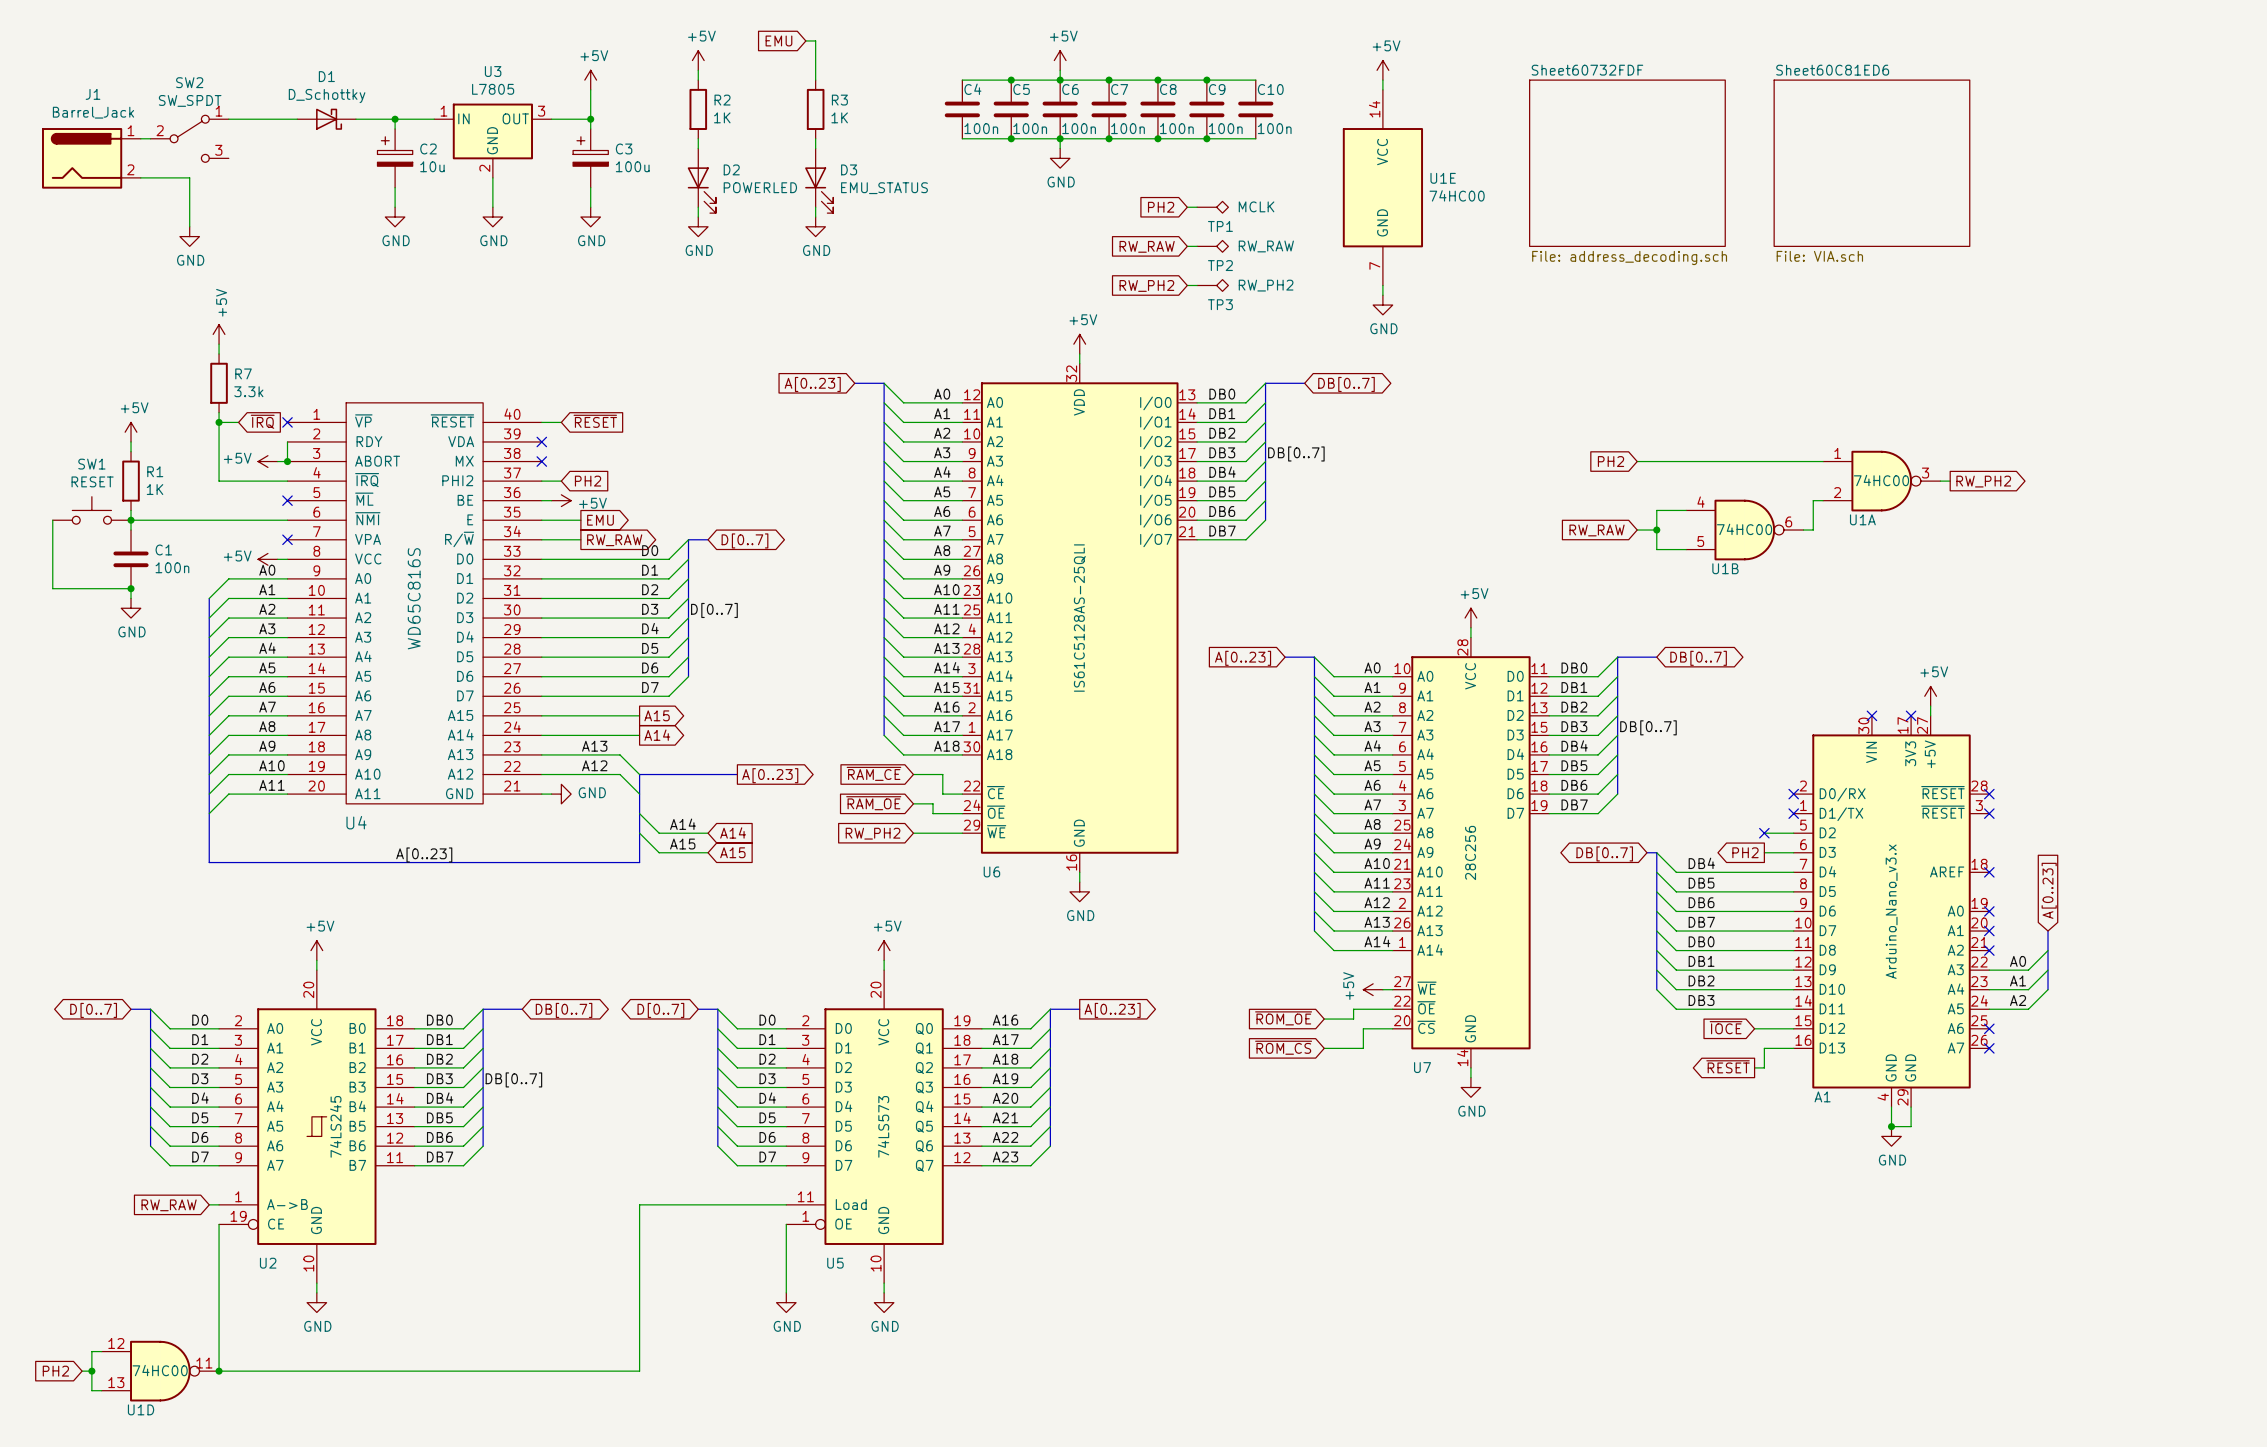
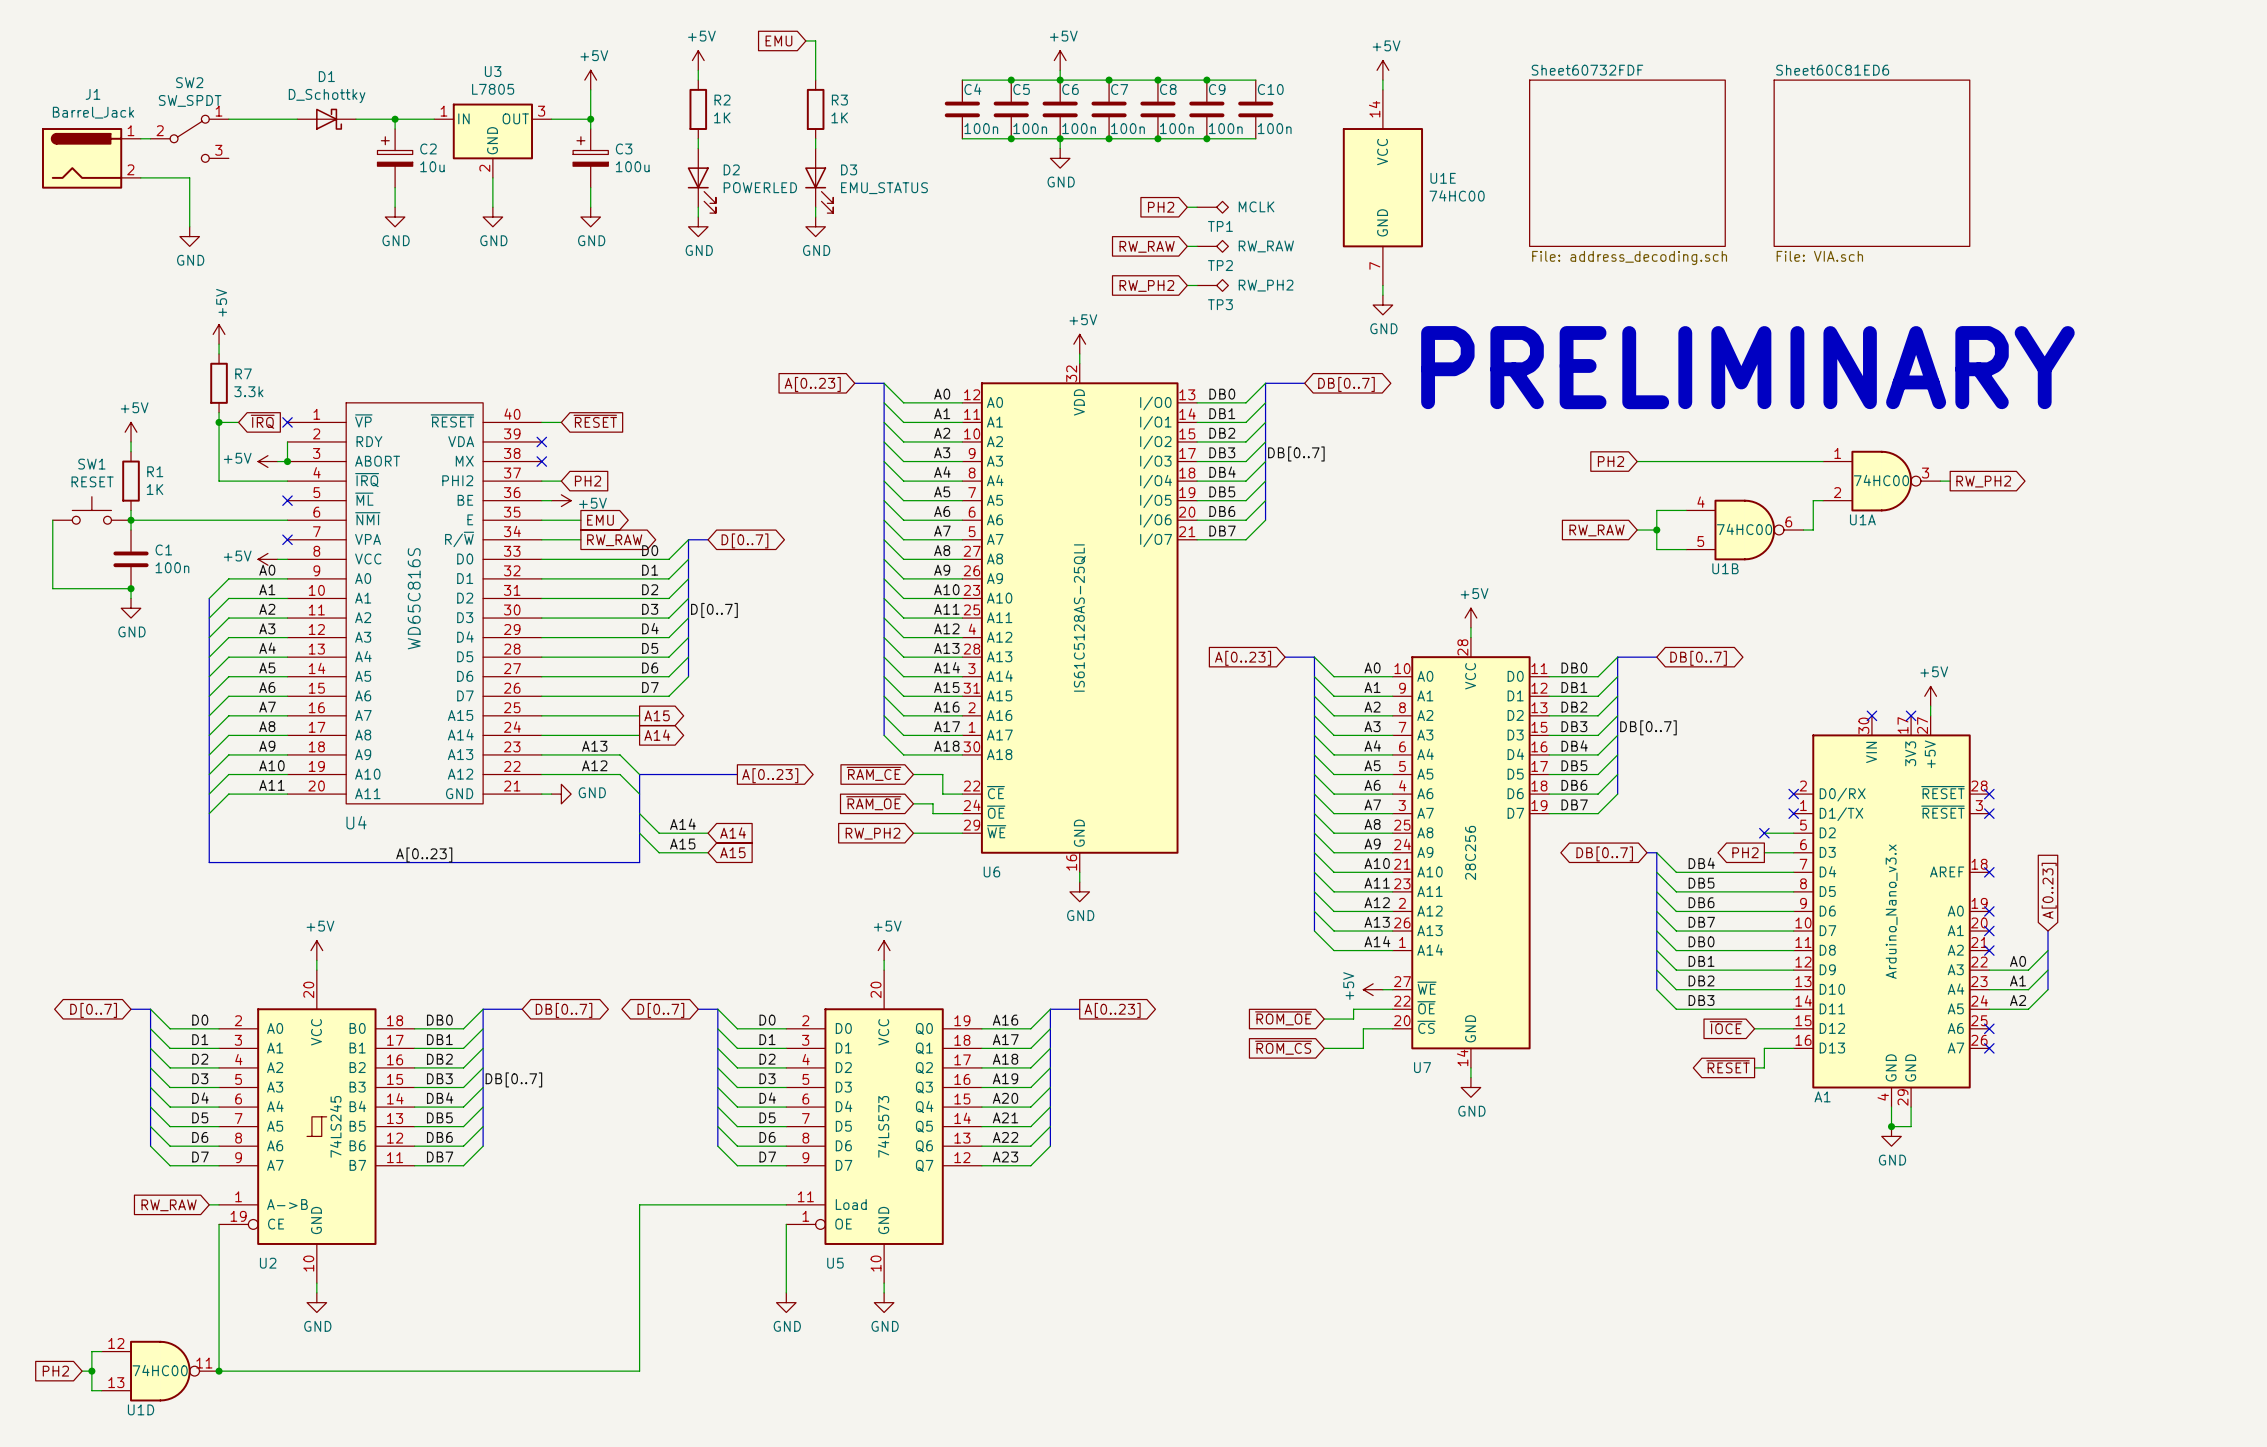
text: none -> PRELIMINARY (1747, 367)

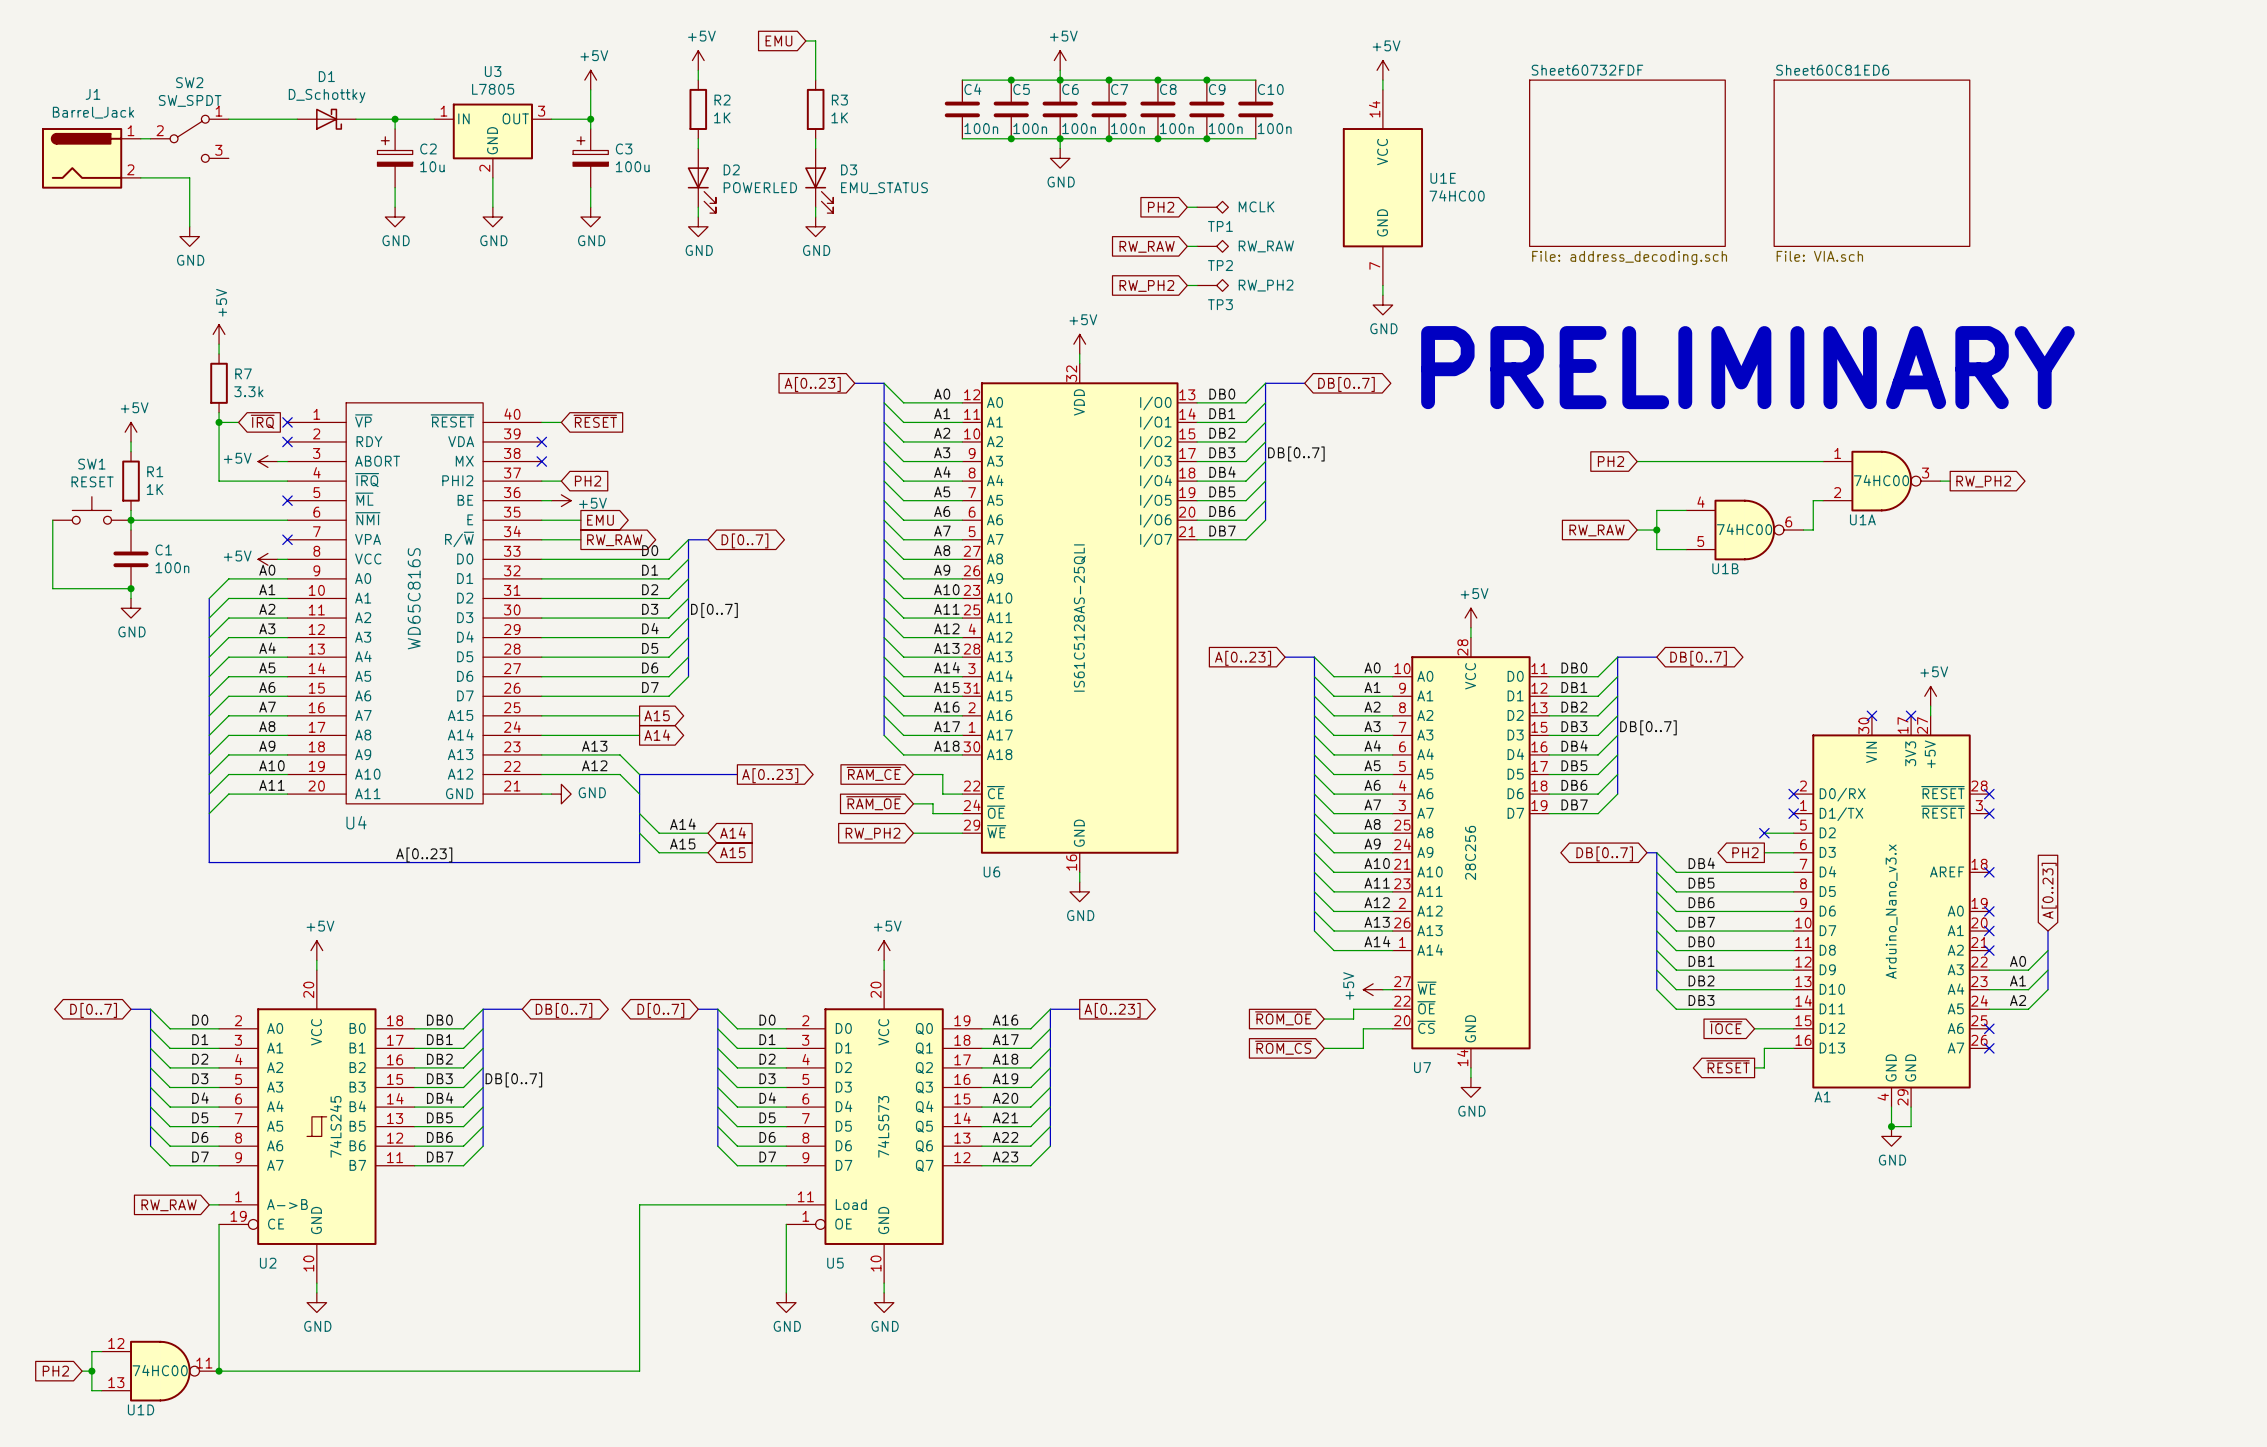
wire: (287, 441) (287, 461) -> none
no-connect mark: none -> (287, 441)
junction: (287, 461) -> none

